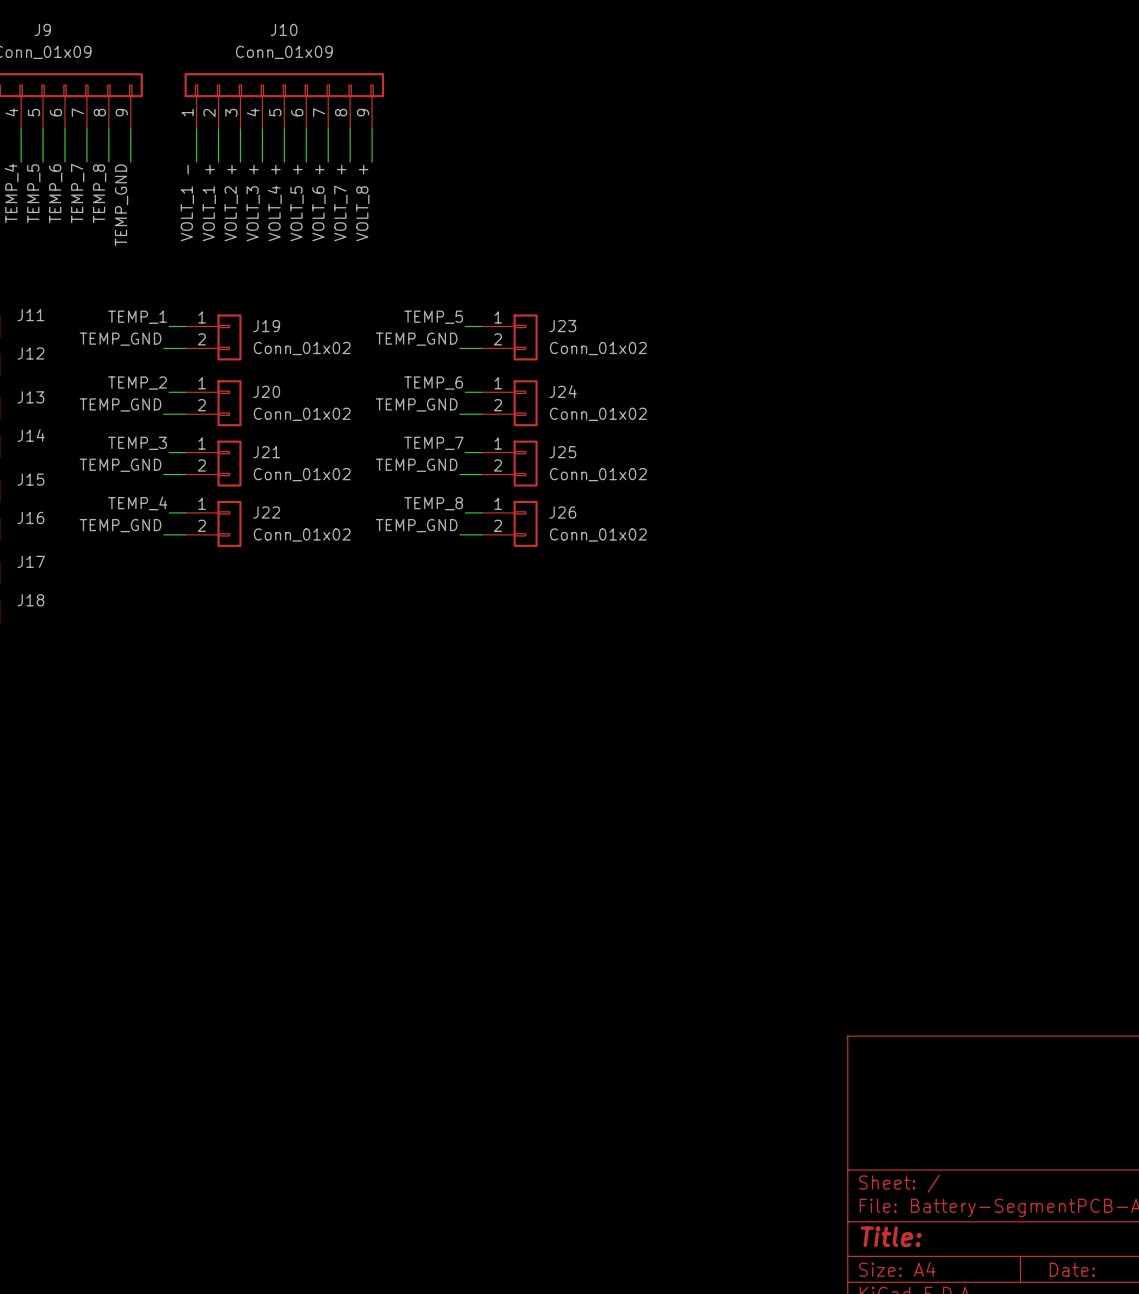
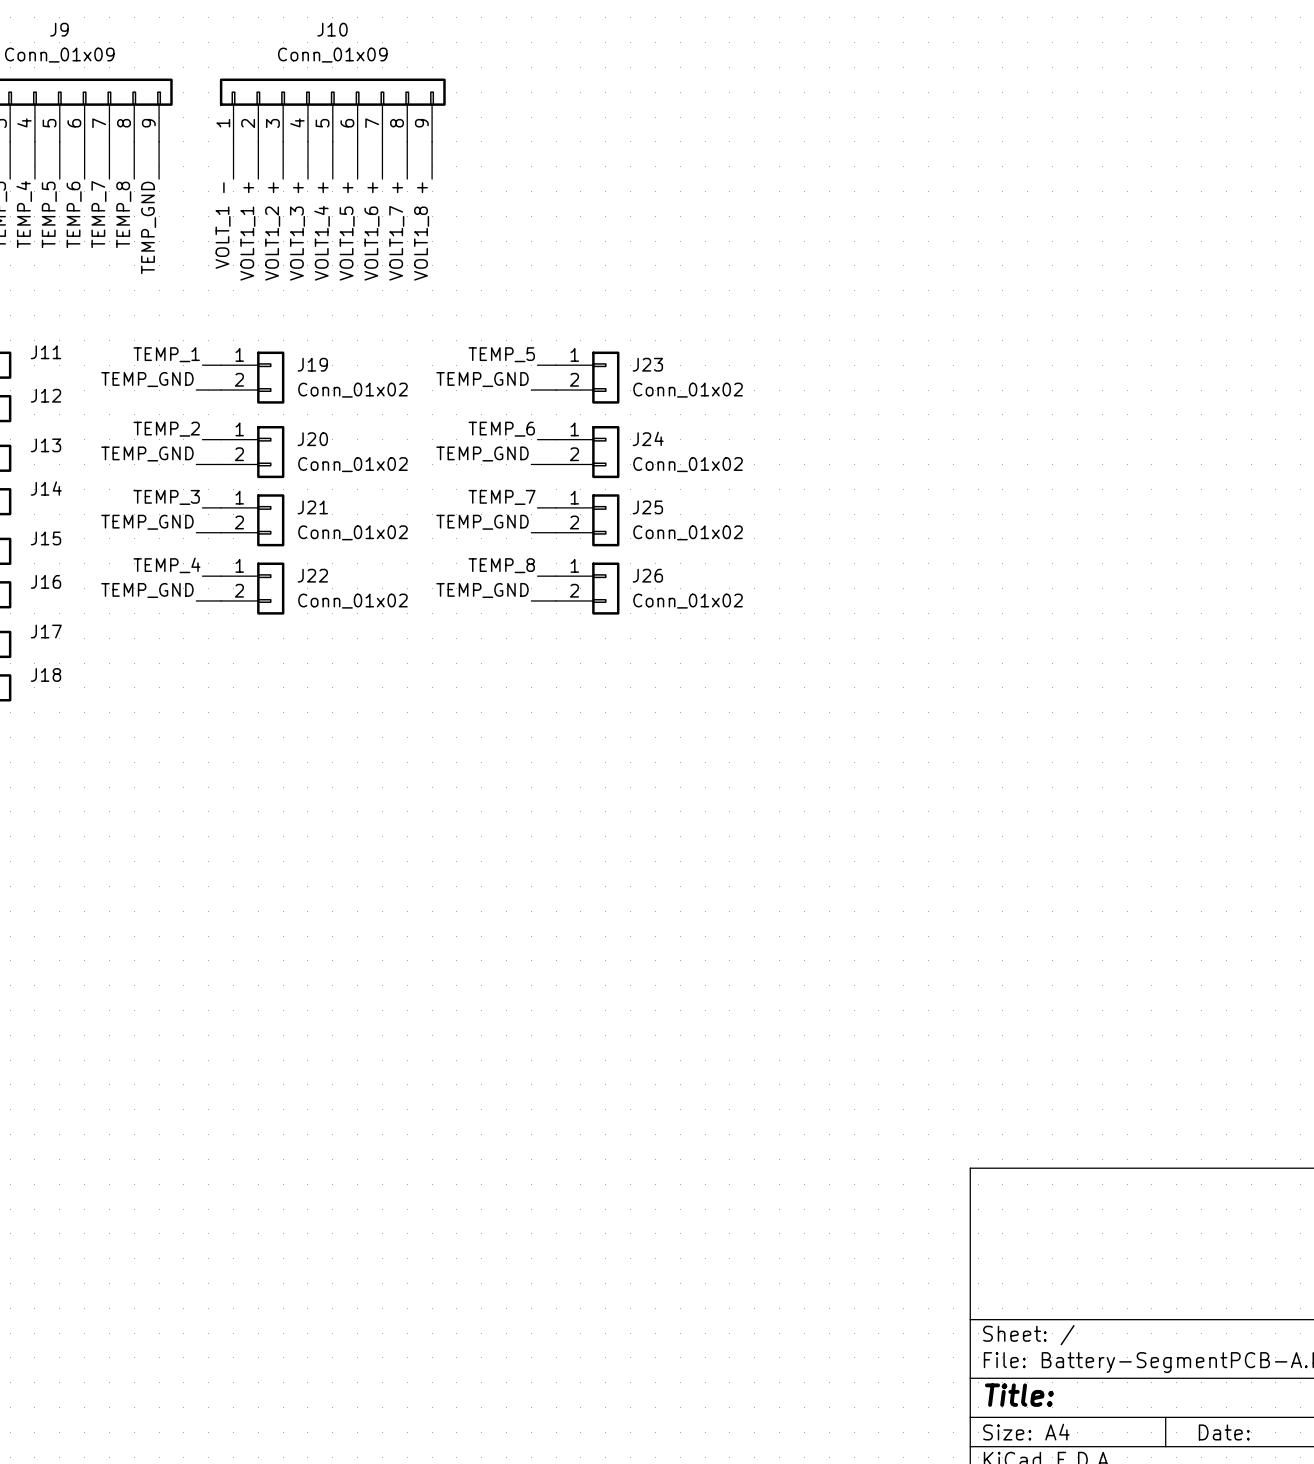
label: VOLT_1 + (209, 203) -> VOLT1_1 + (247, 231)
label: VOLT_2 + (231, 203) -> VOLT1_2 + (272, 231)
label: VOLT_3 + (253, 203) -> VOLT1_3 + (297, 231)
label: VOLT_4 + (274, 203) -> VOLT1_4 + (322, 231)
label: VOLT_5 + (297, 203) -> VOLT1_5 + (347, 231)
label: VOLT_6 + (318, 203) -> VOLT1_6 + (371, 231)
label: VOLT_7 + (340, 203) -> VOLT1_7 + (396, 231)
label: VOLT_8 + (362, 203) -> VOLT1_8 + (421, 231)

